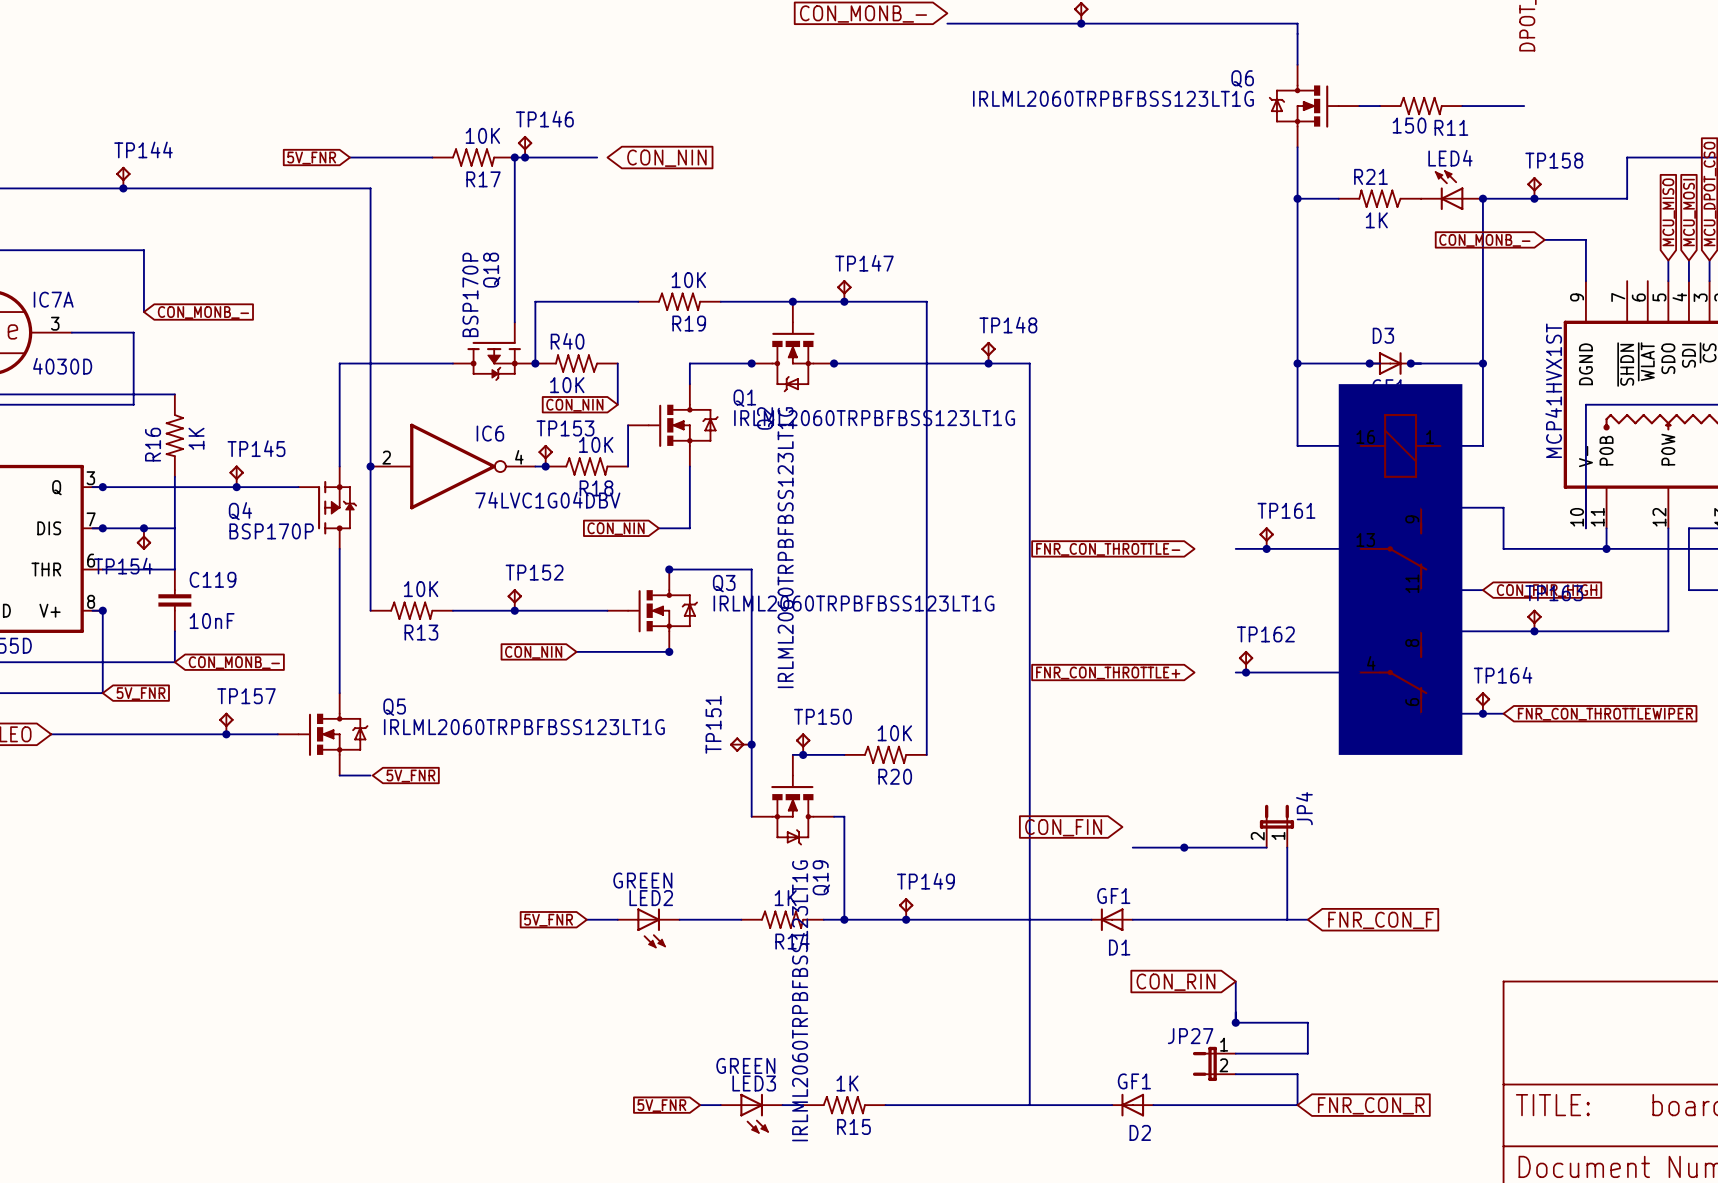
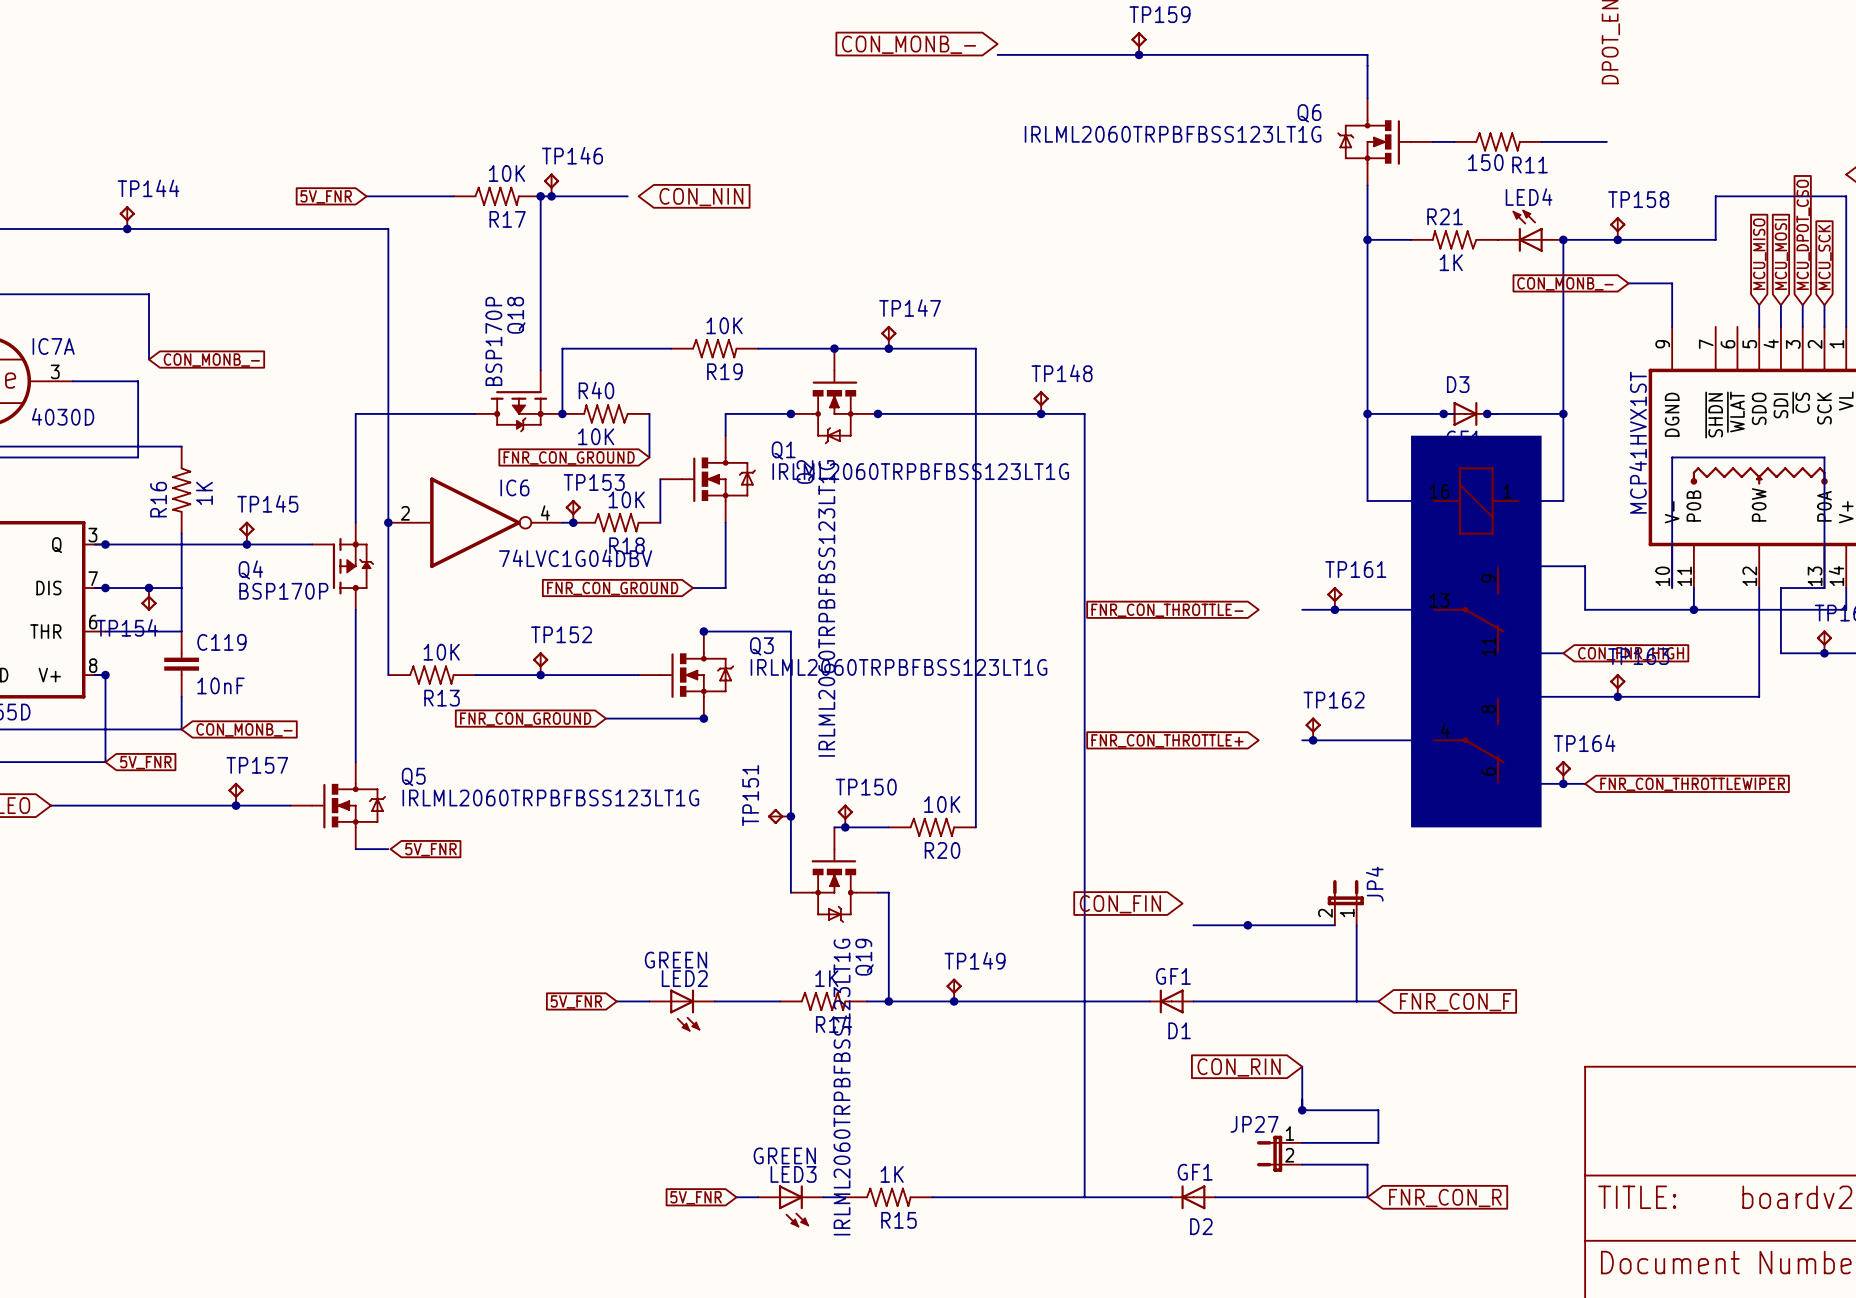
global label: CON_NIN (574, 405) -> FNR_CON_GROUND (569, 457)
global label: CON_NIN (616, 528) -> FNR_CON_GROUND (612, 588)
global label: CON_NIN (533, 652) -> FNR_CON_GROUND (525, 719)

